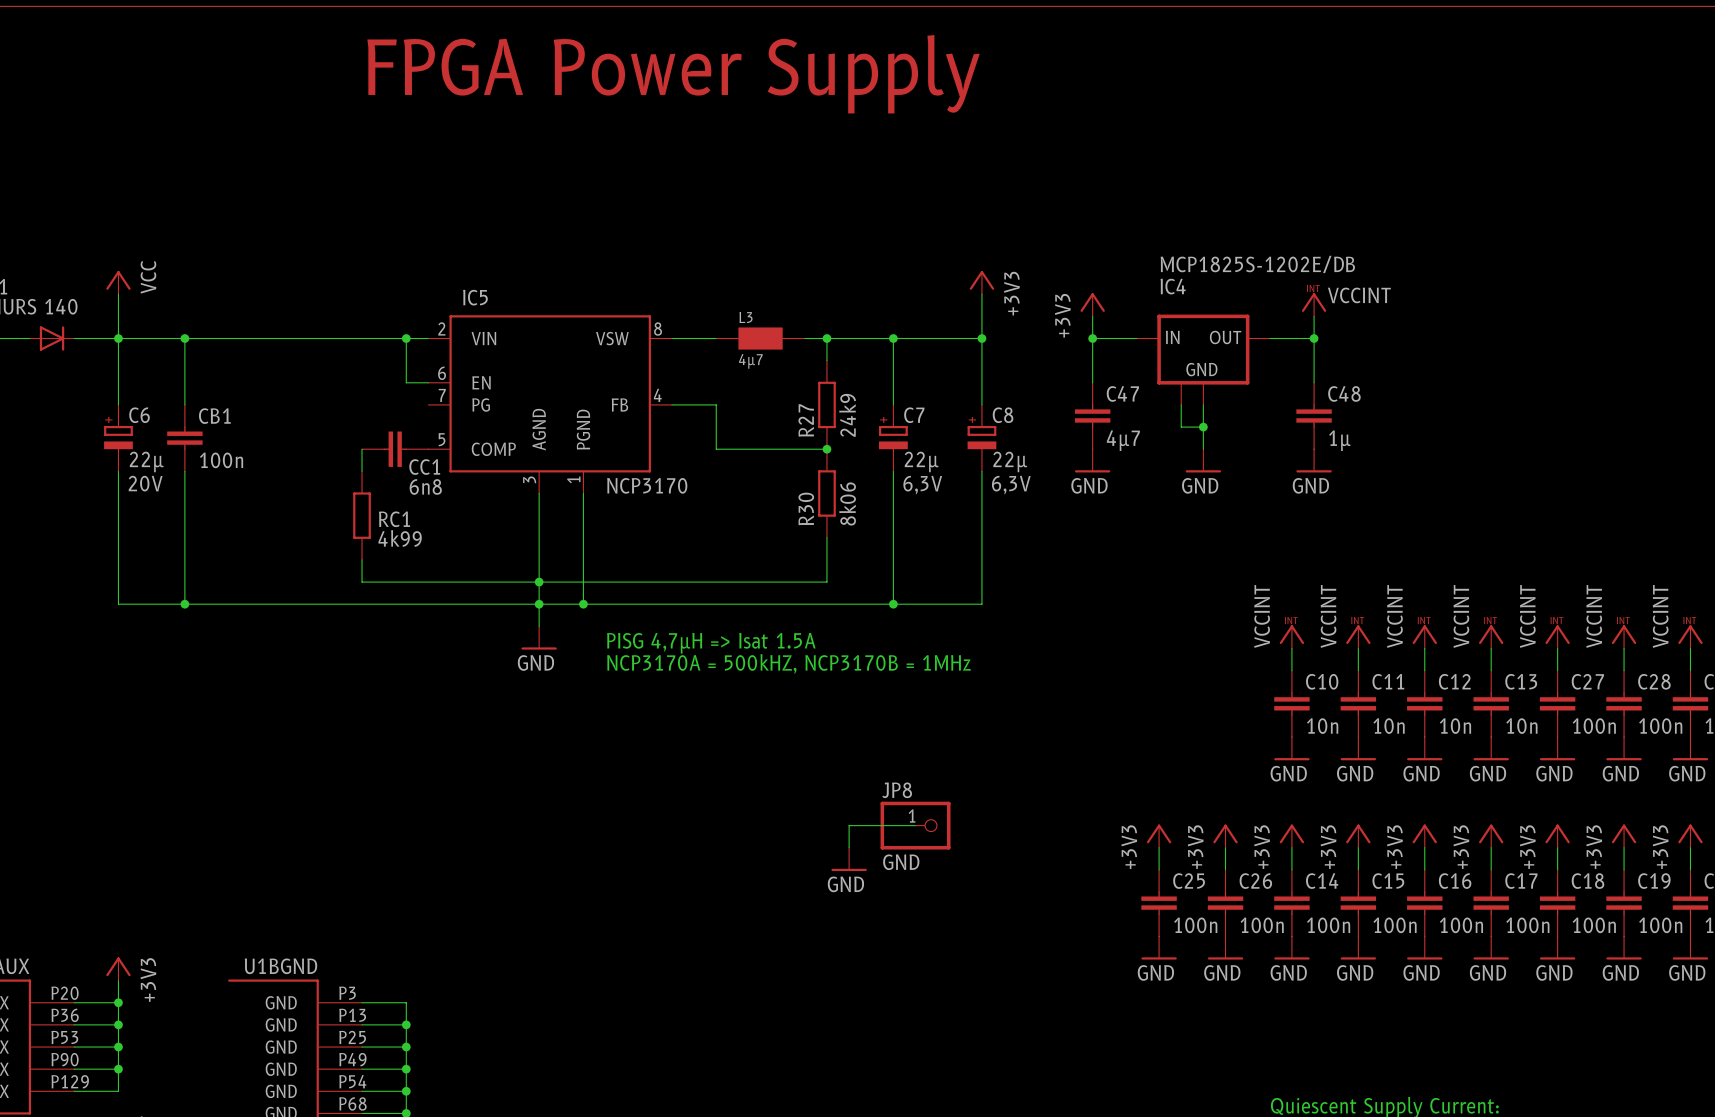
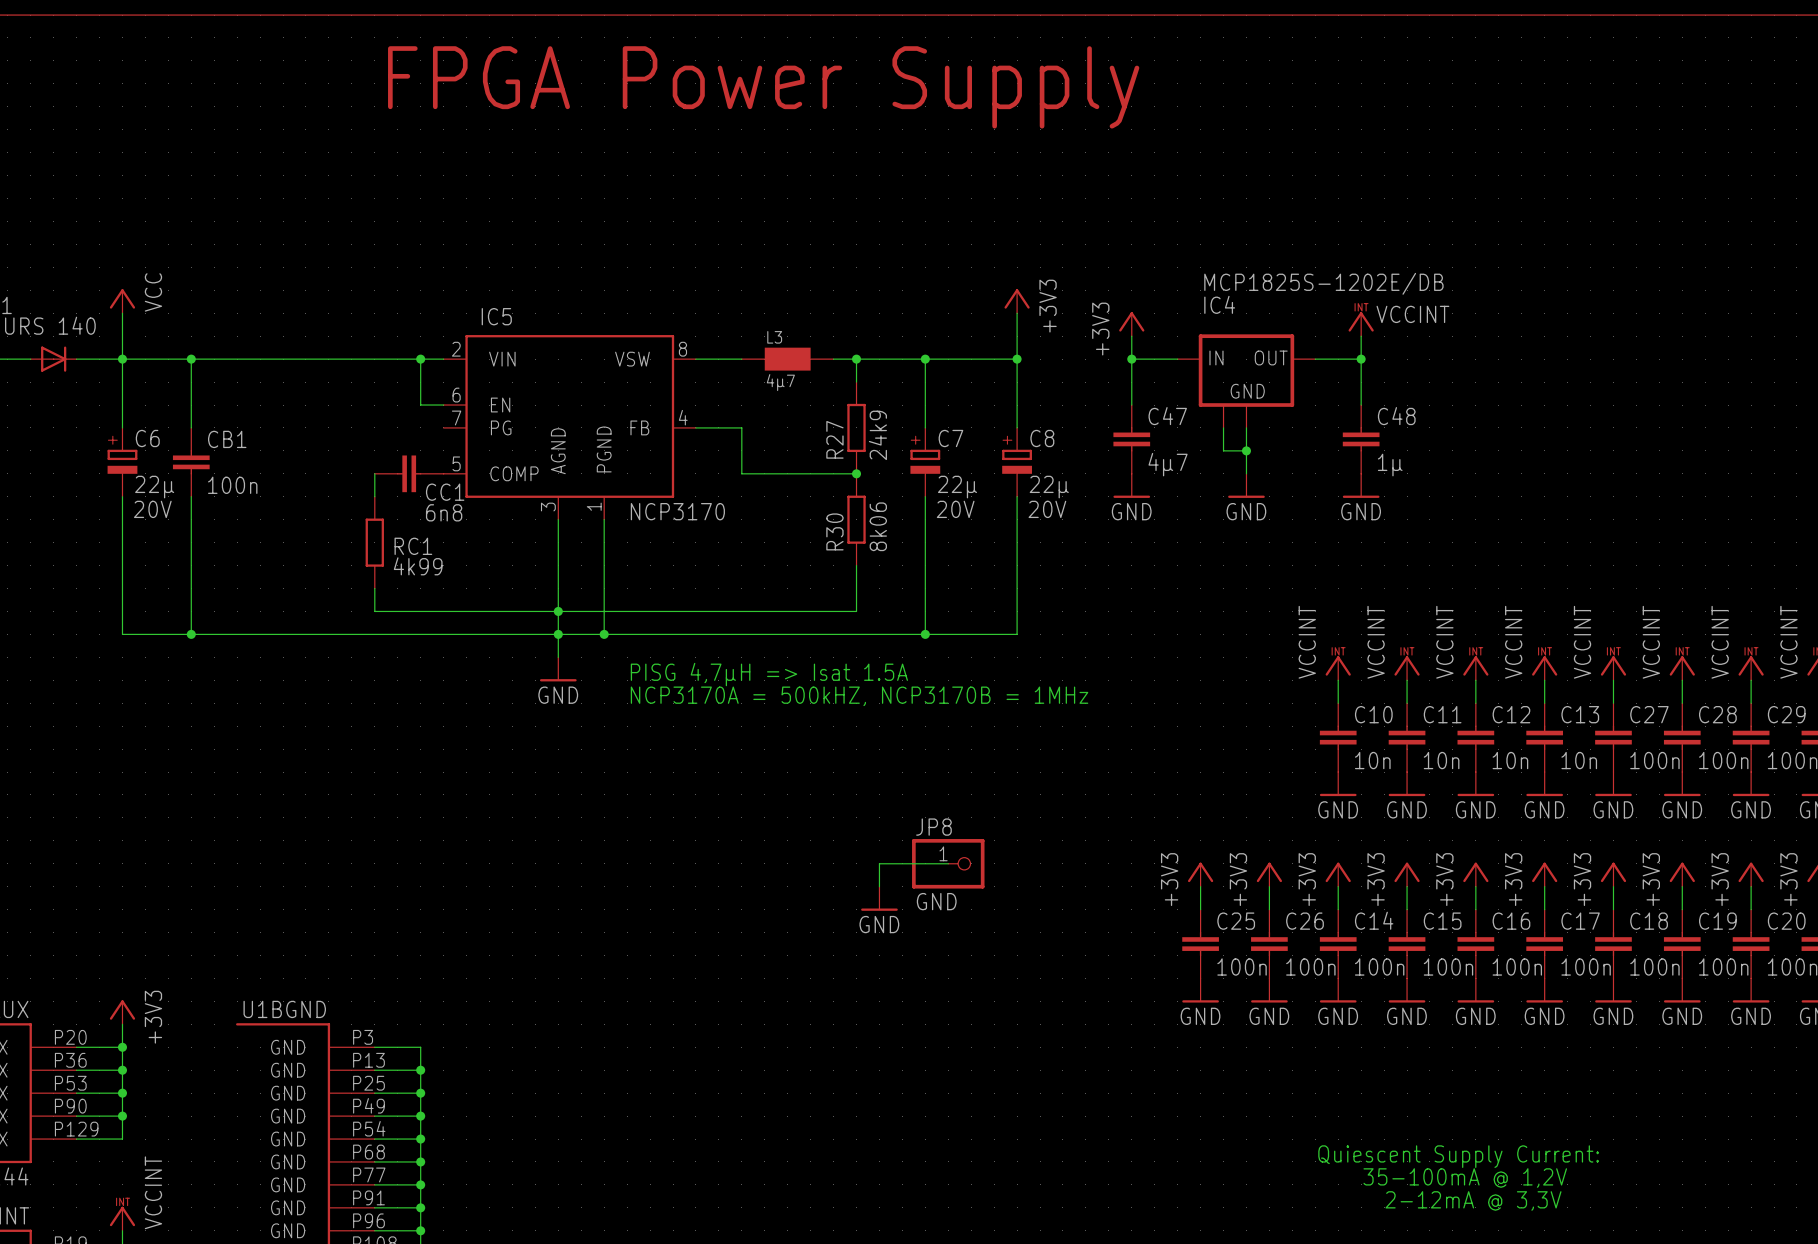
C7 text: 6,3V (922, 485) -> 20V (955, 509)
C8 text: 6,3V (1011, 485) -> 20V (1047, 509)

